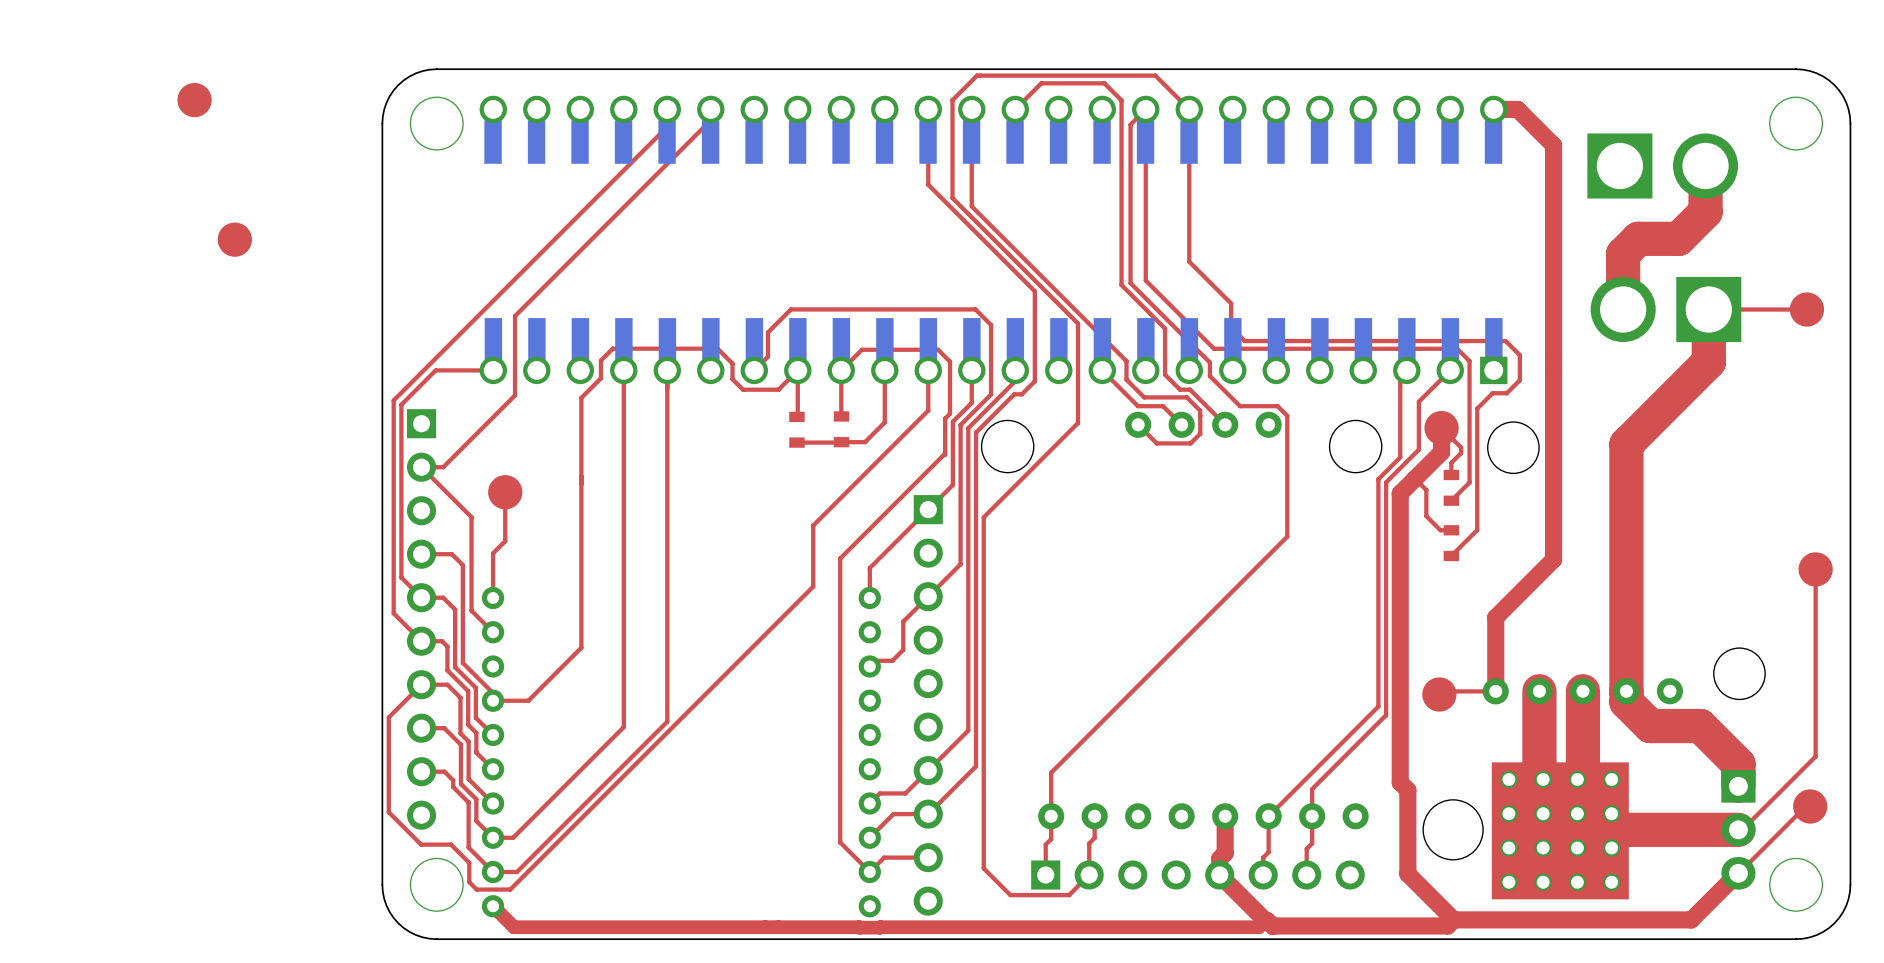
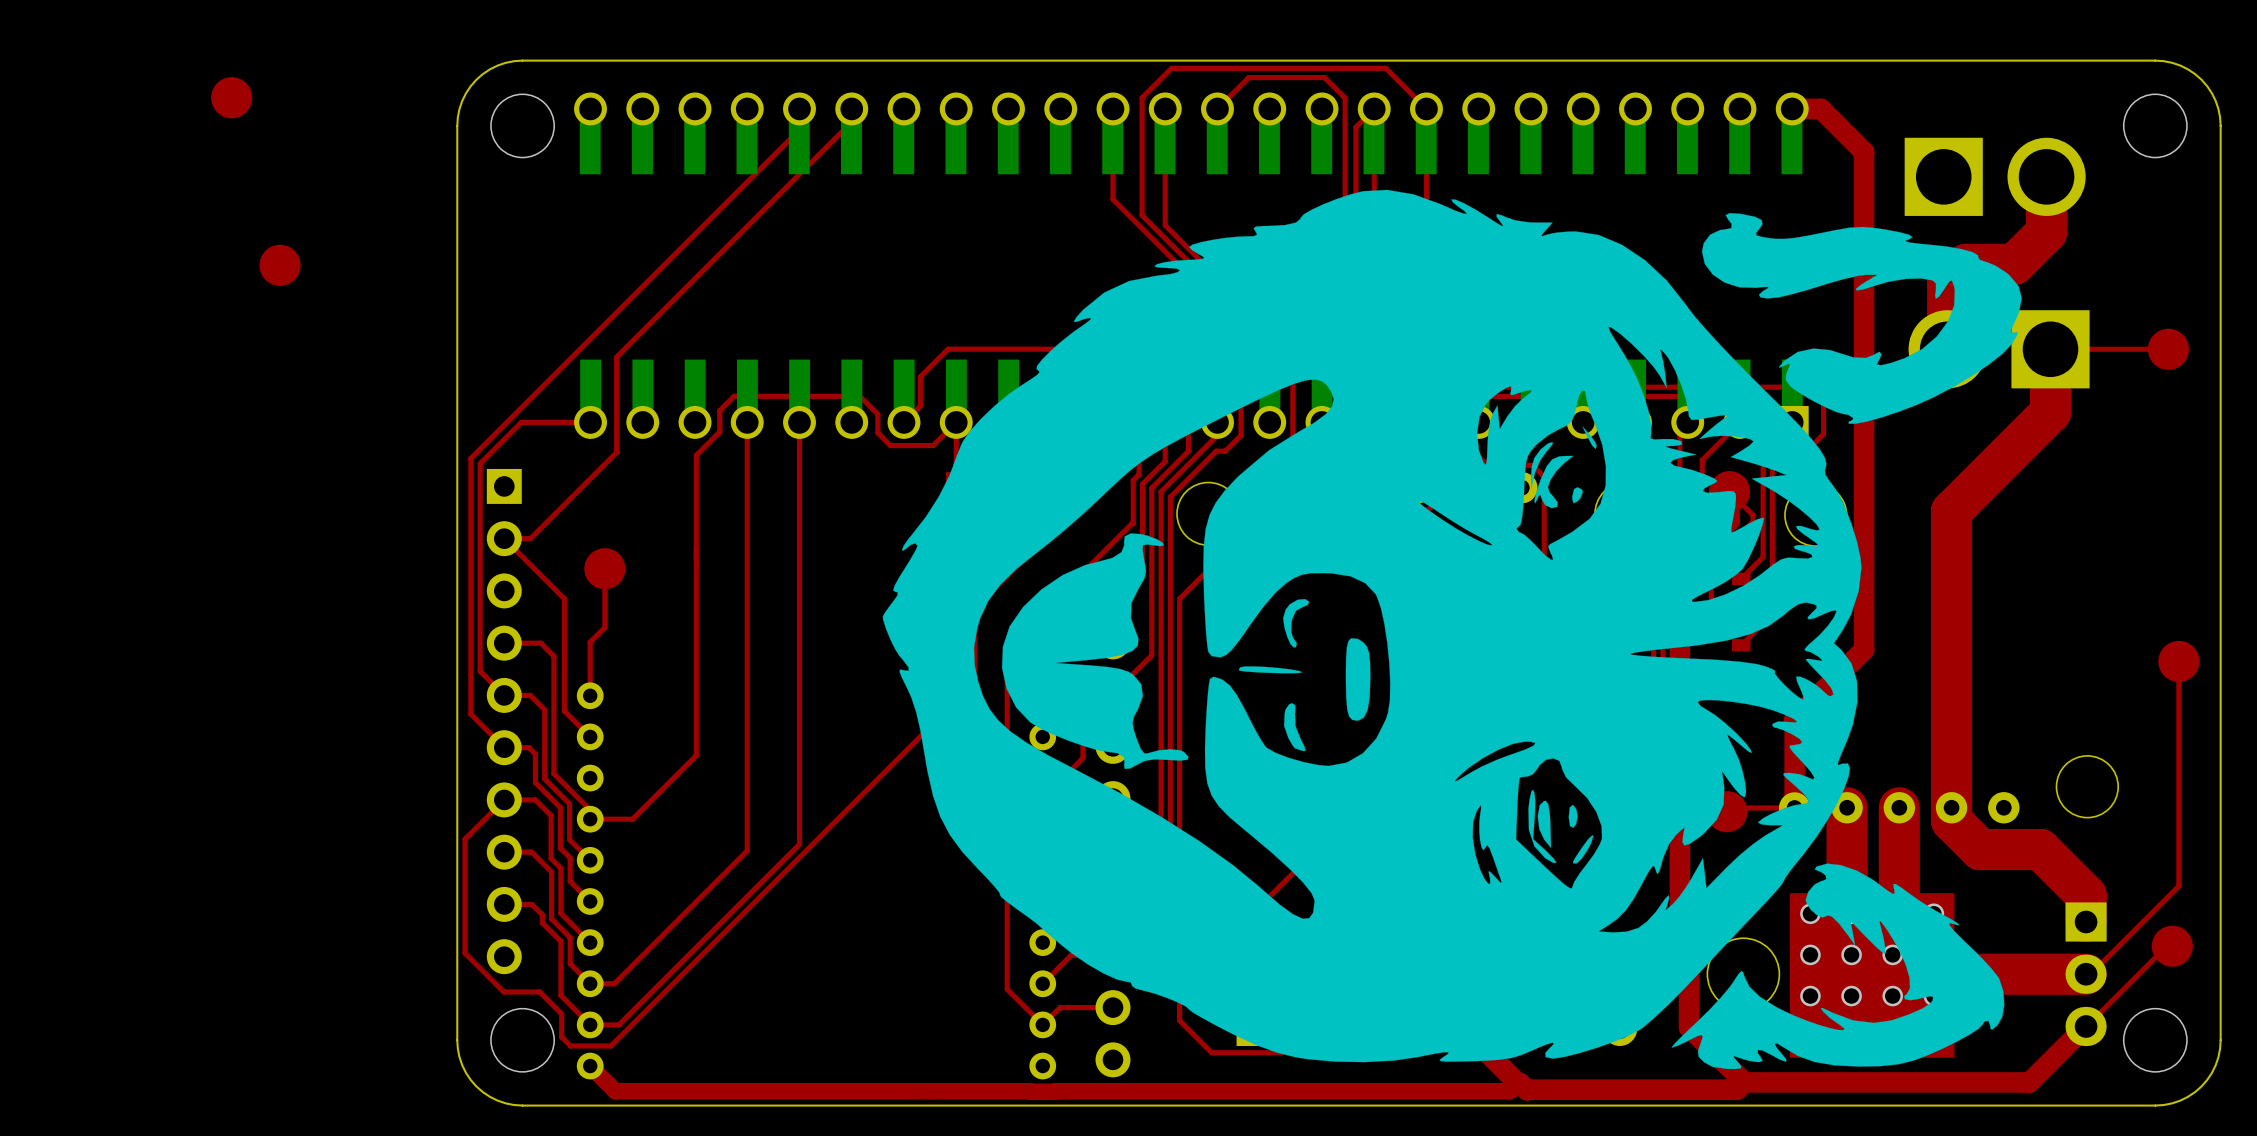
drawing: none -> [882, 189, 2022, 1070]

